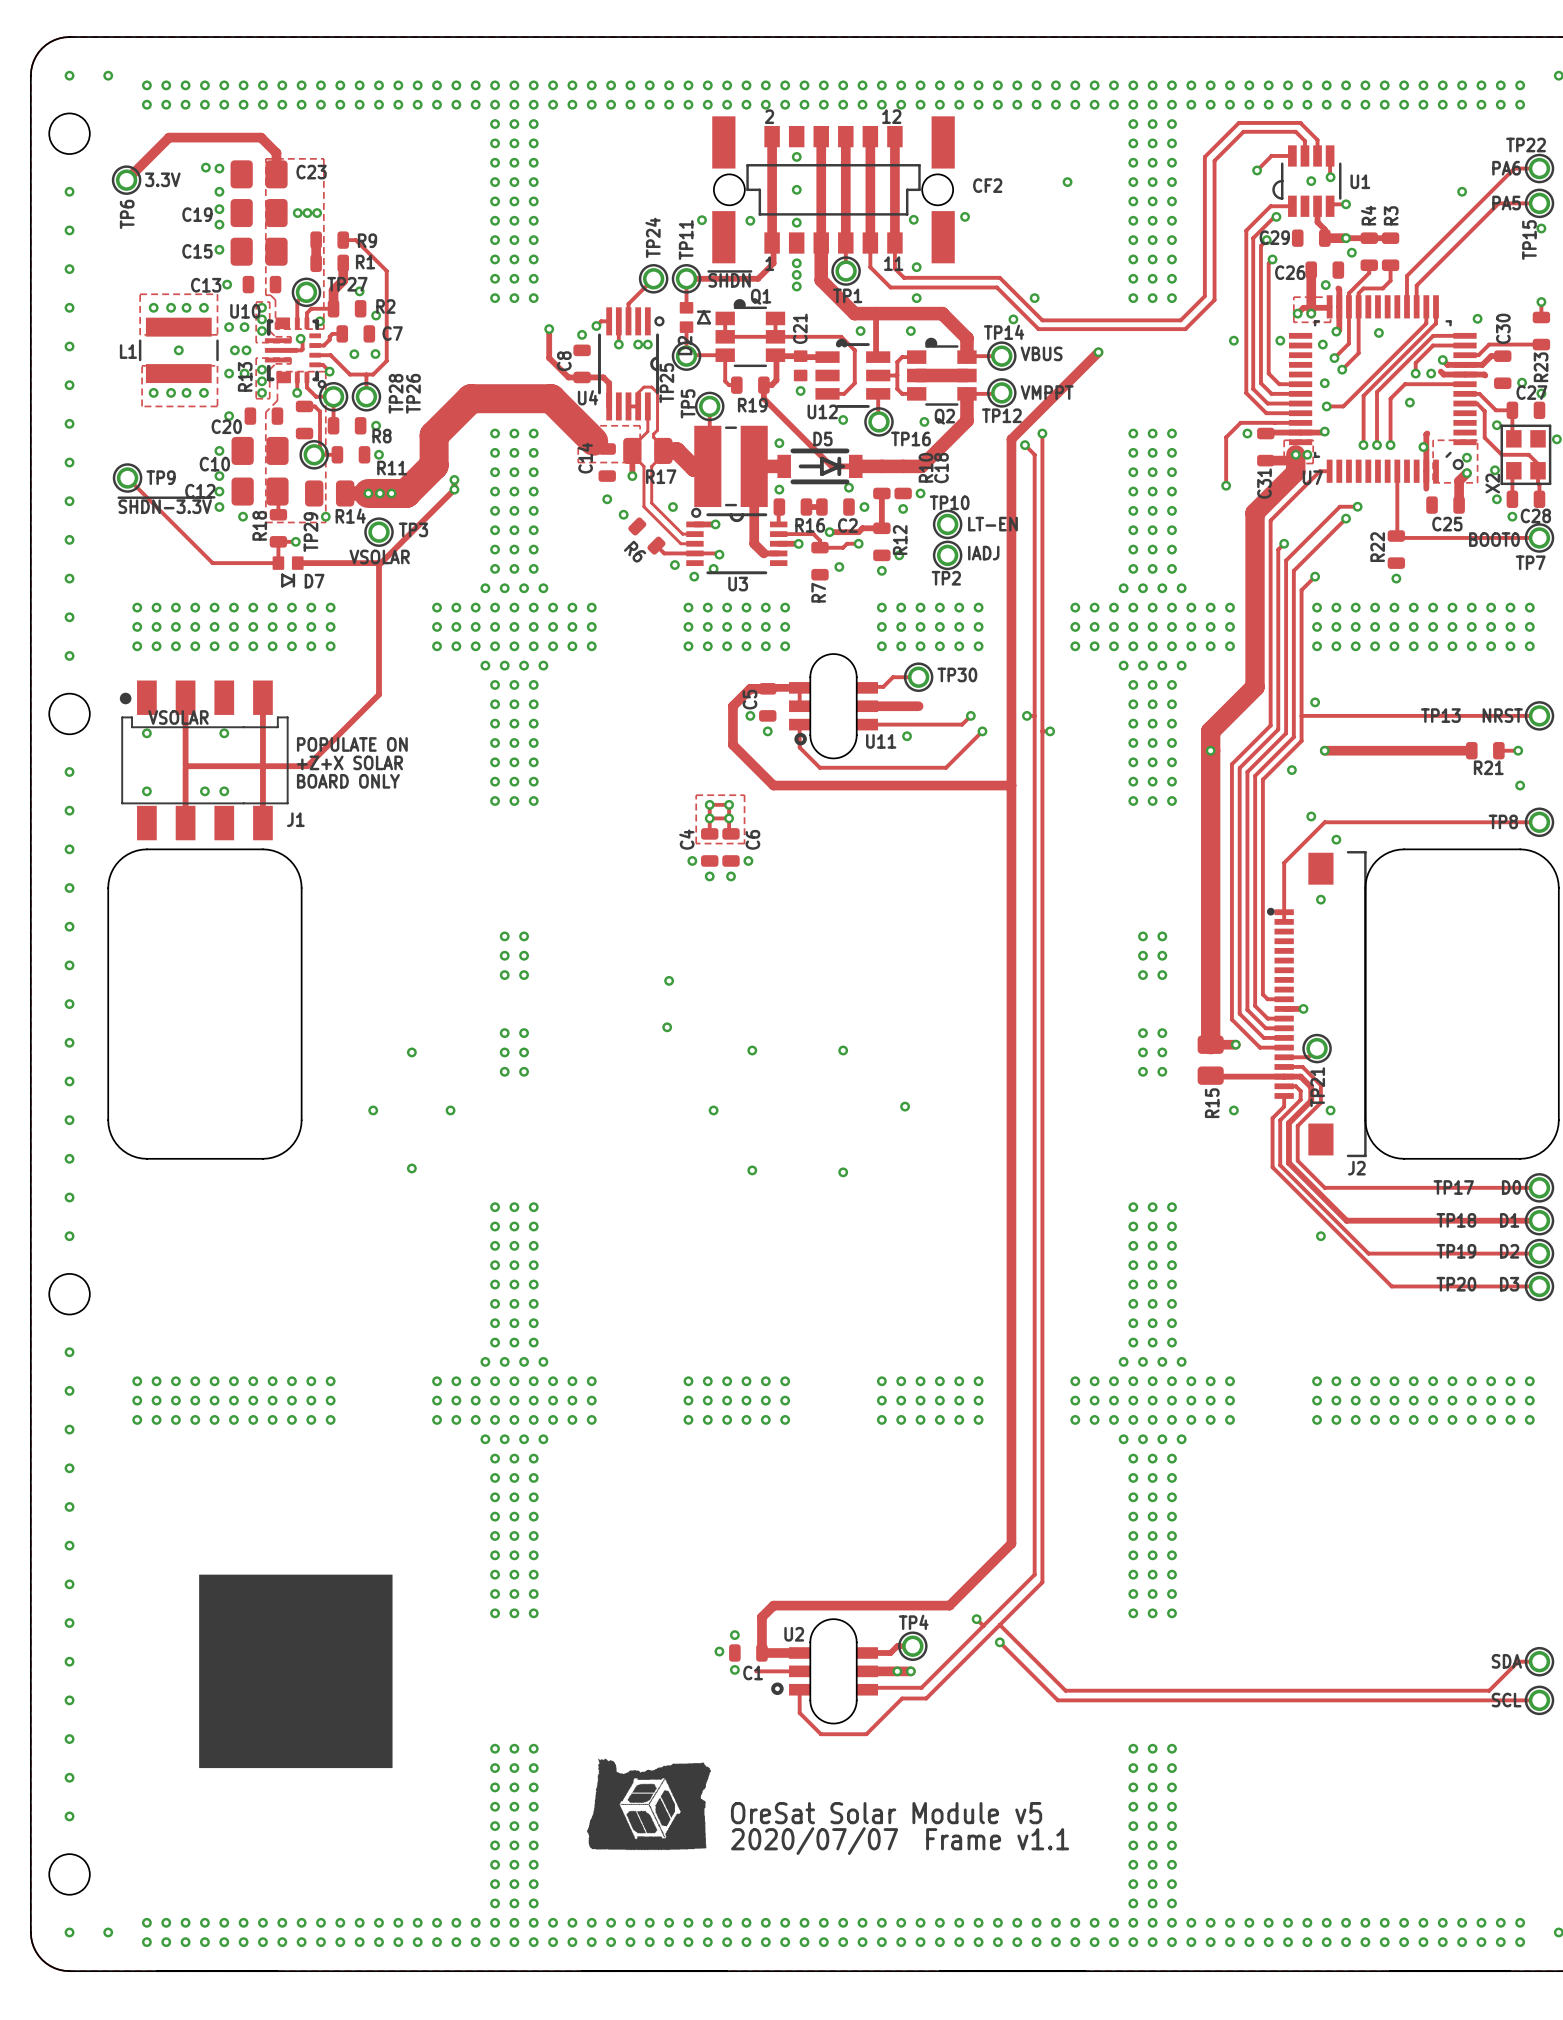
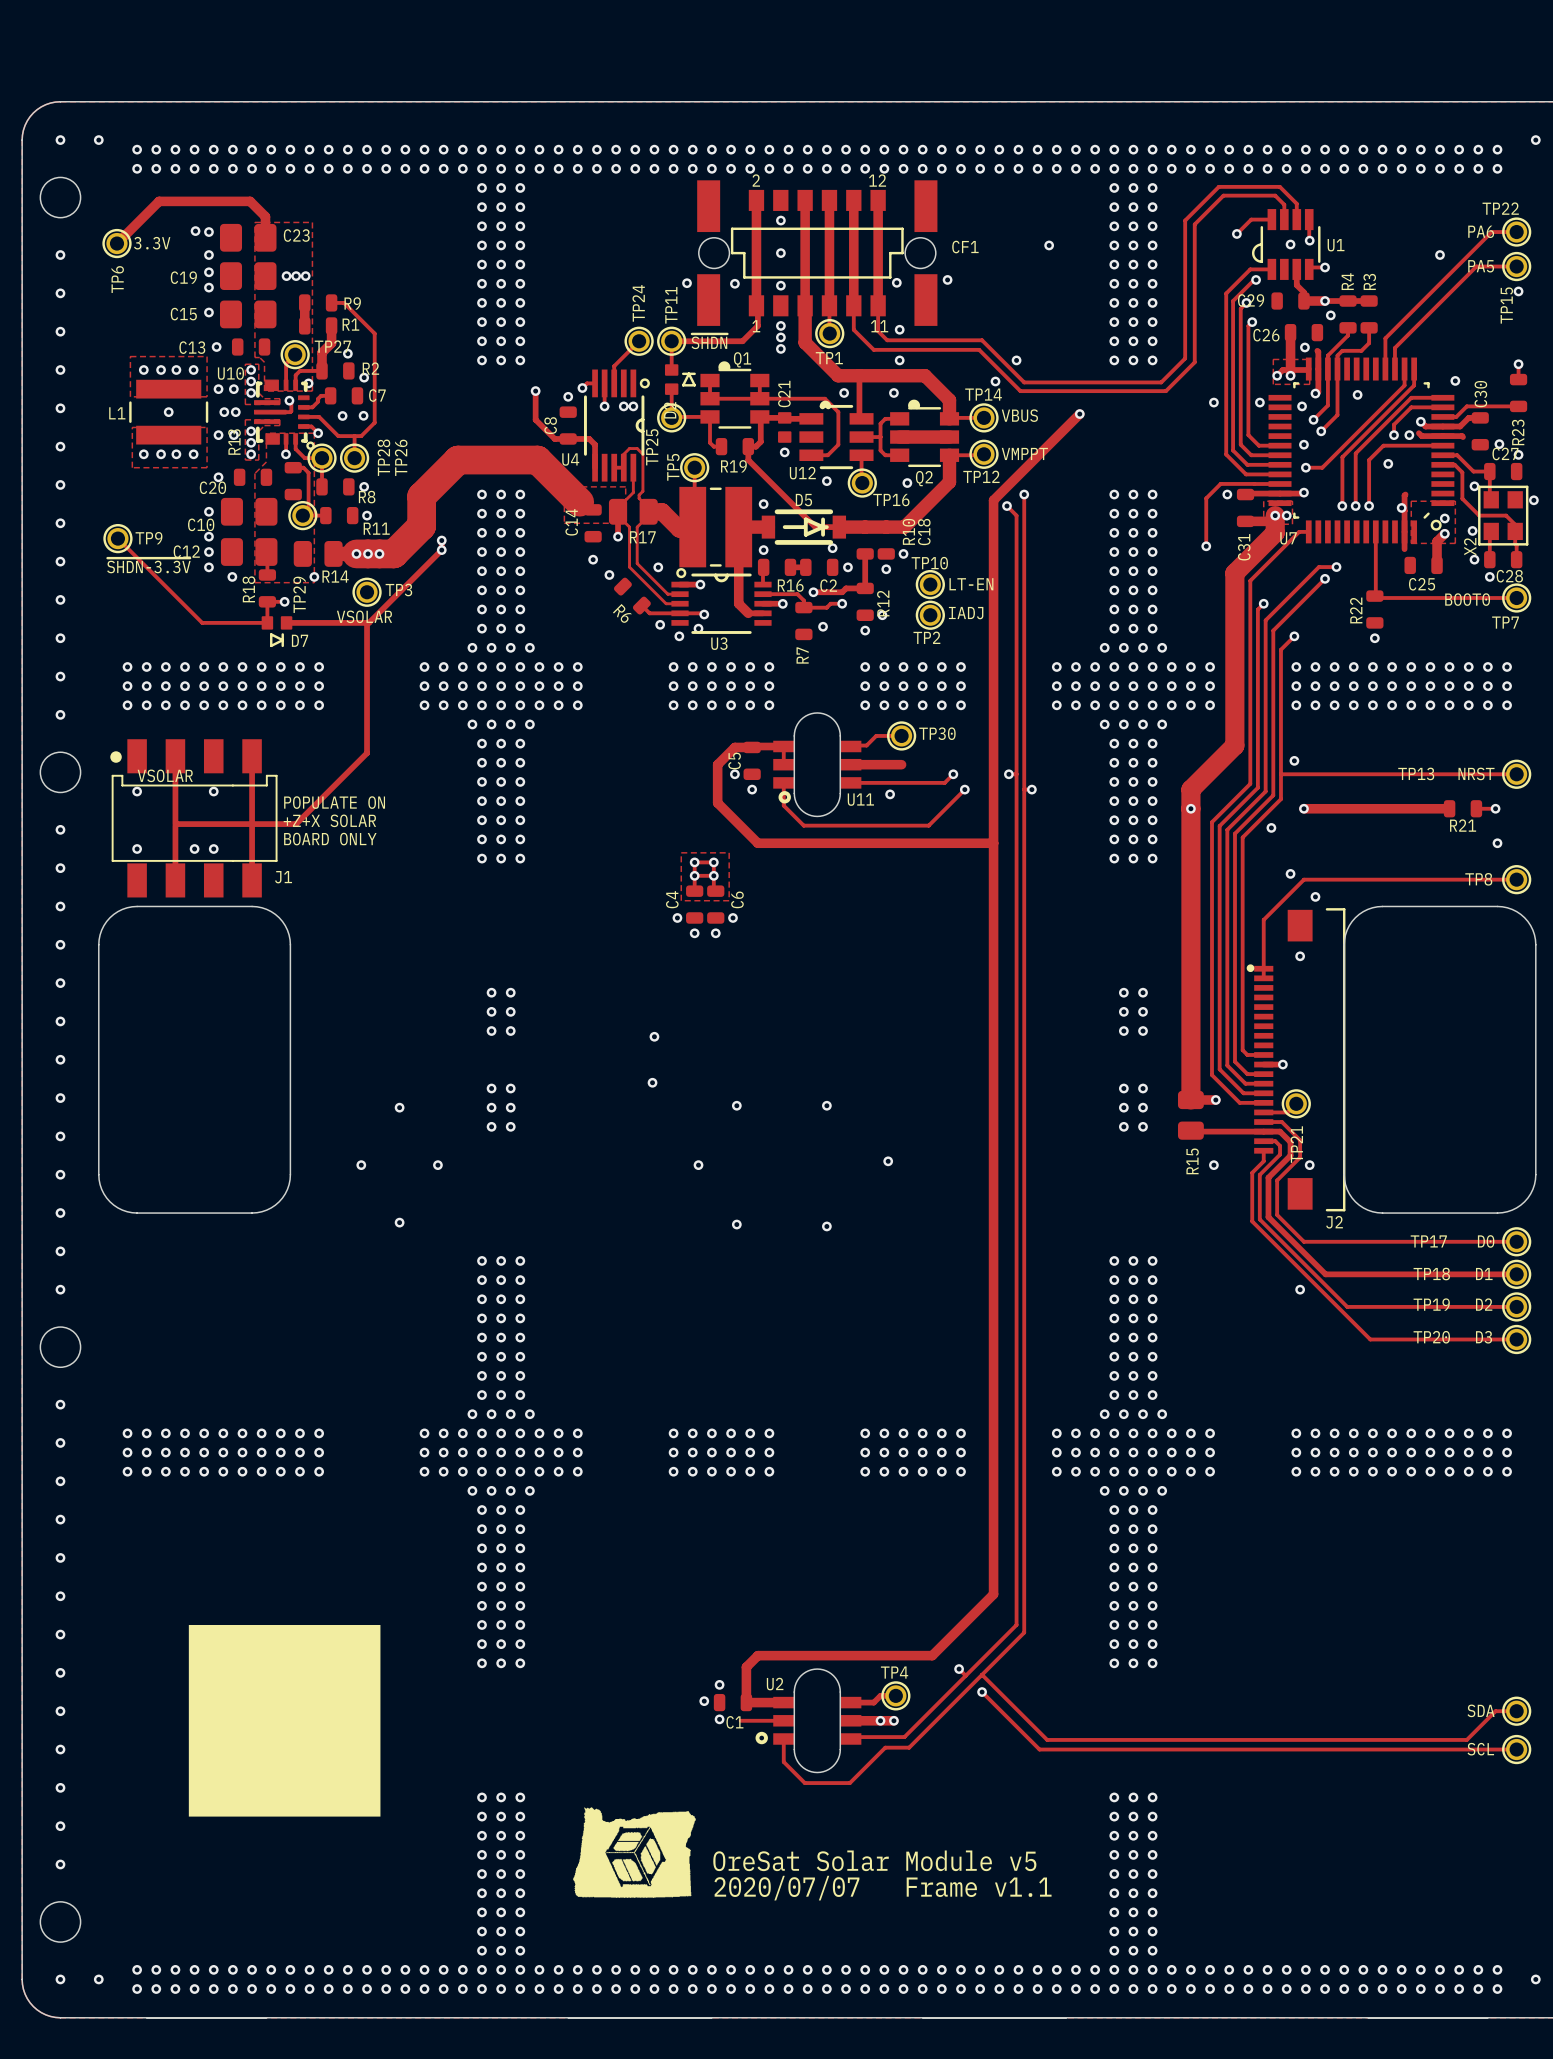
CF2 name: CF2 (987, 185) -> CF1 (965, 247)

